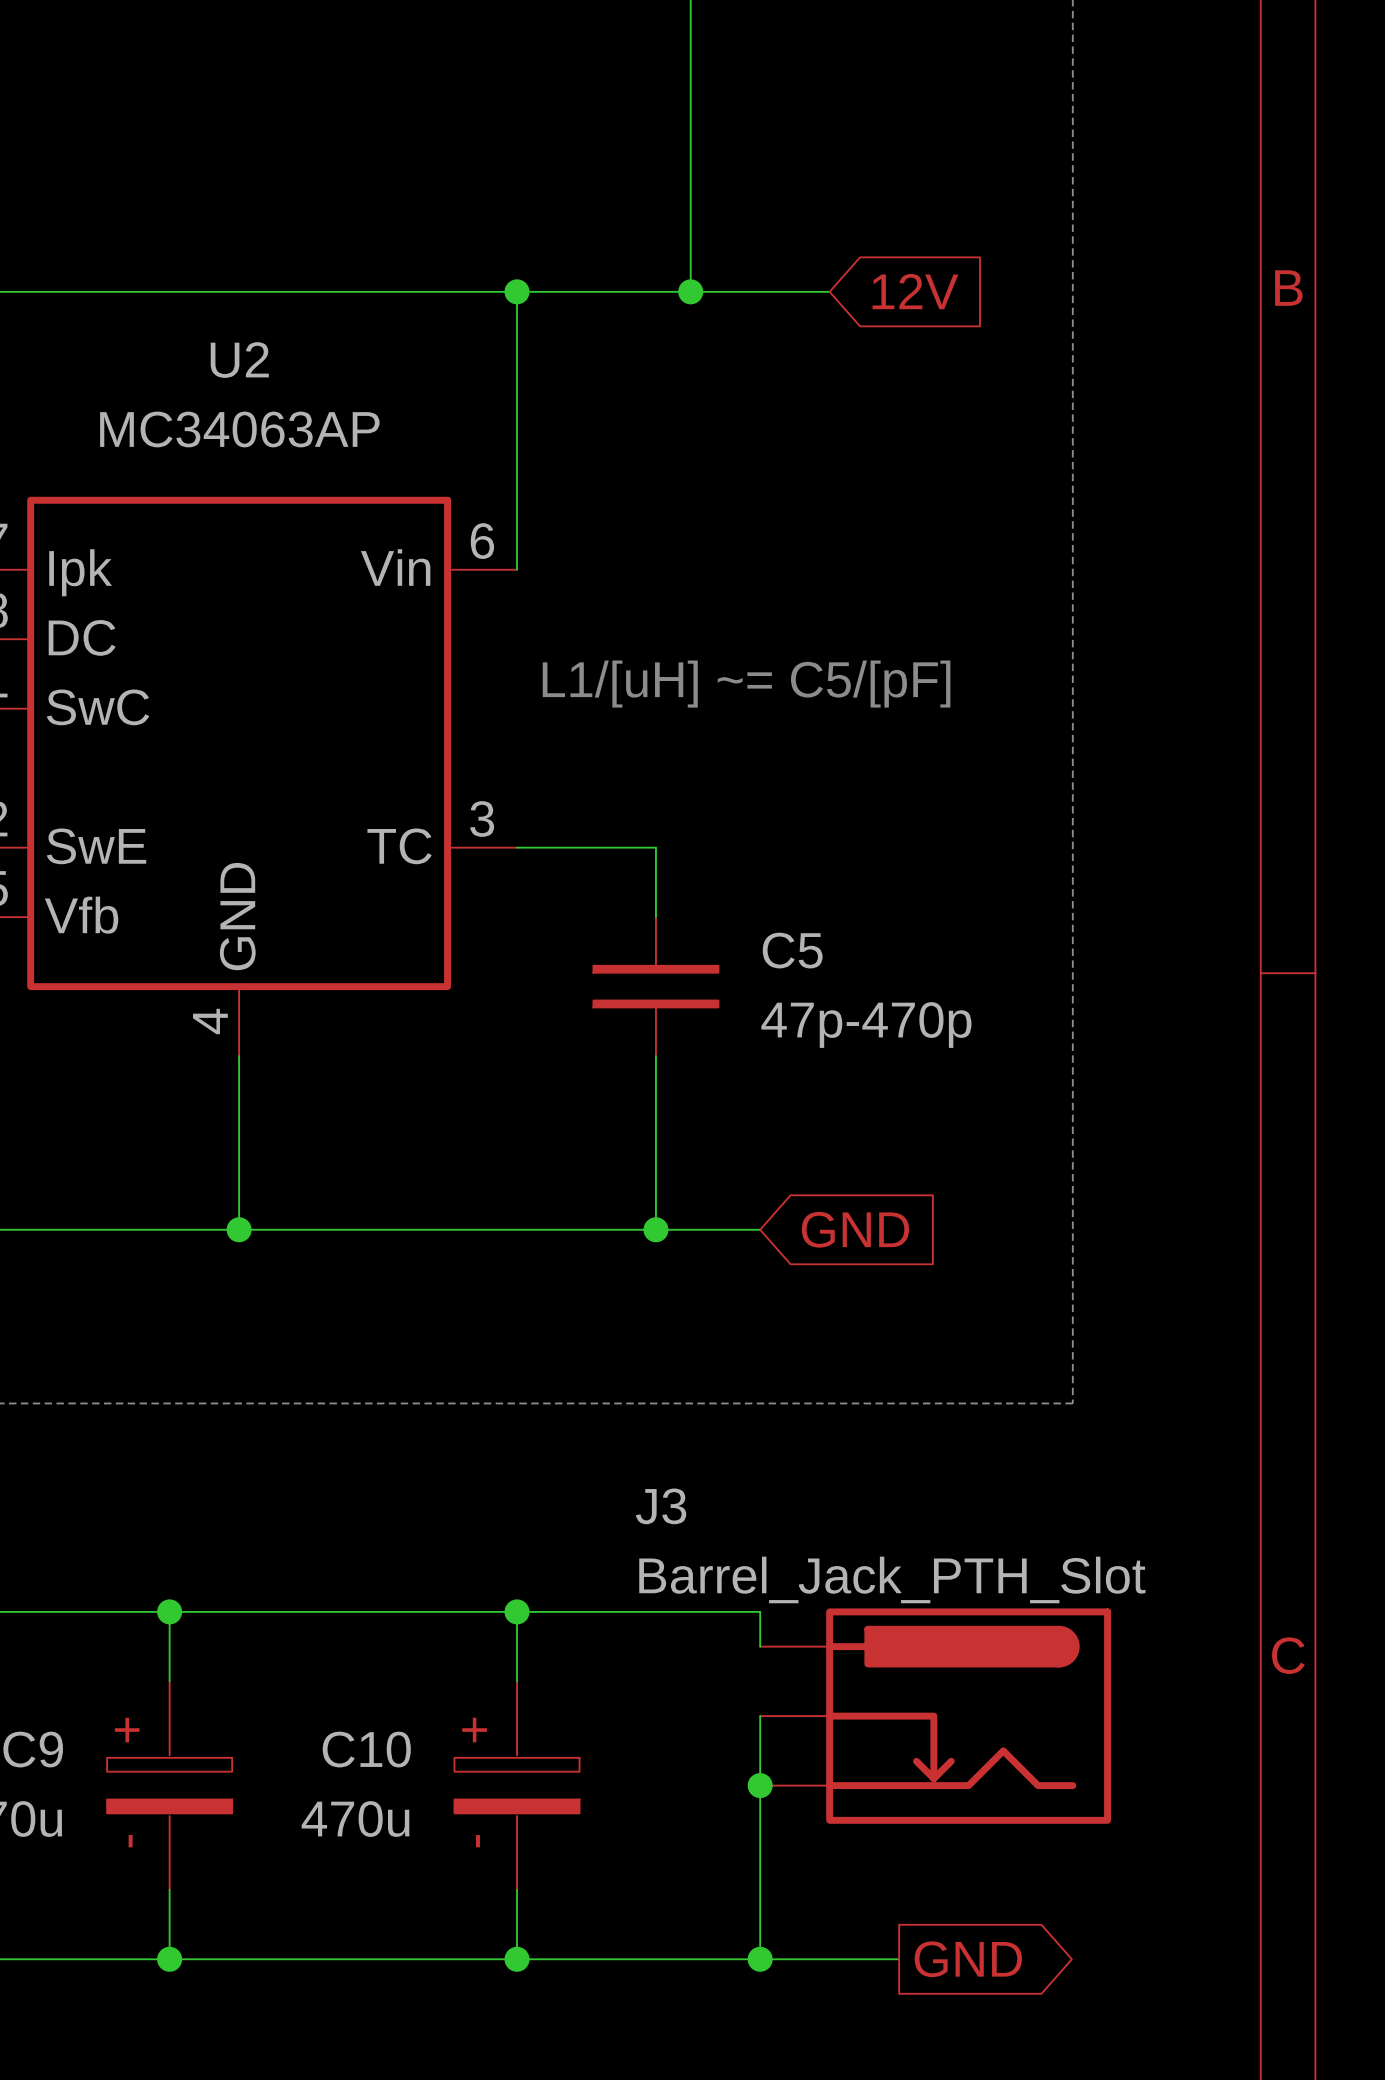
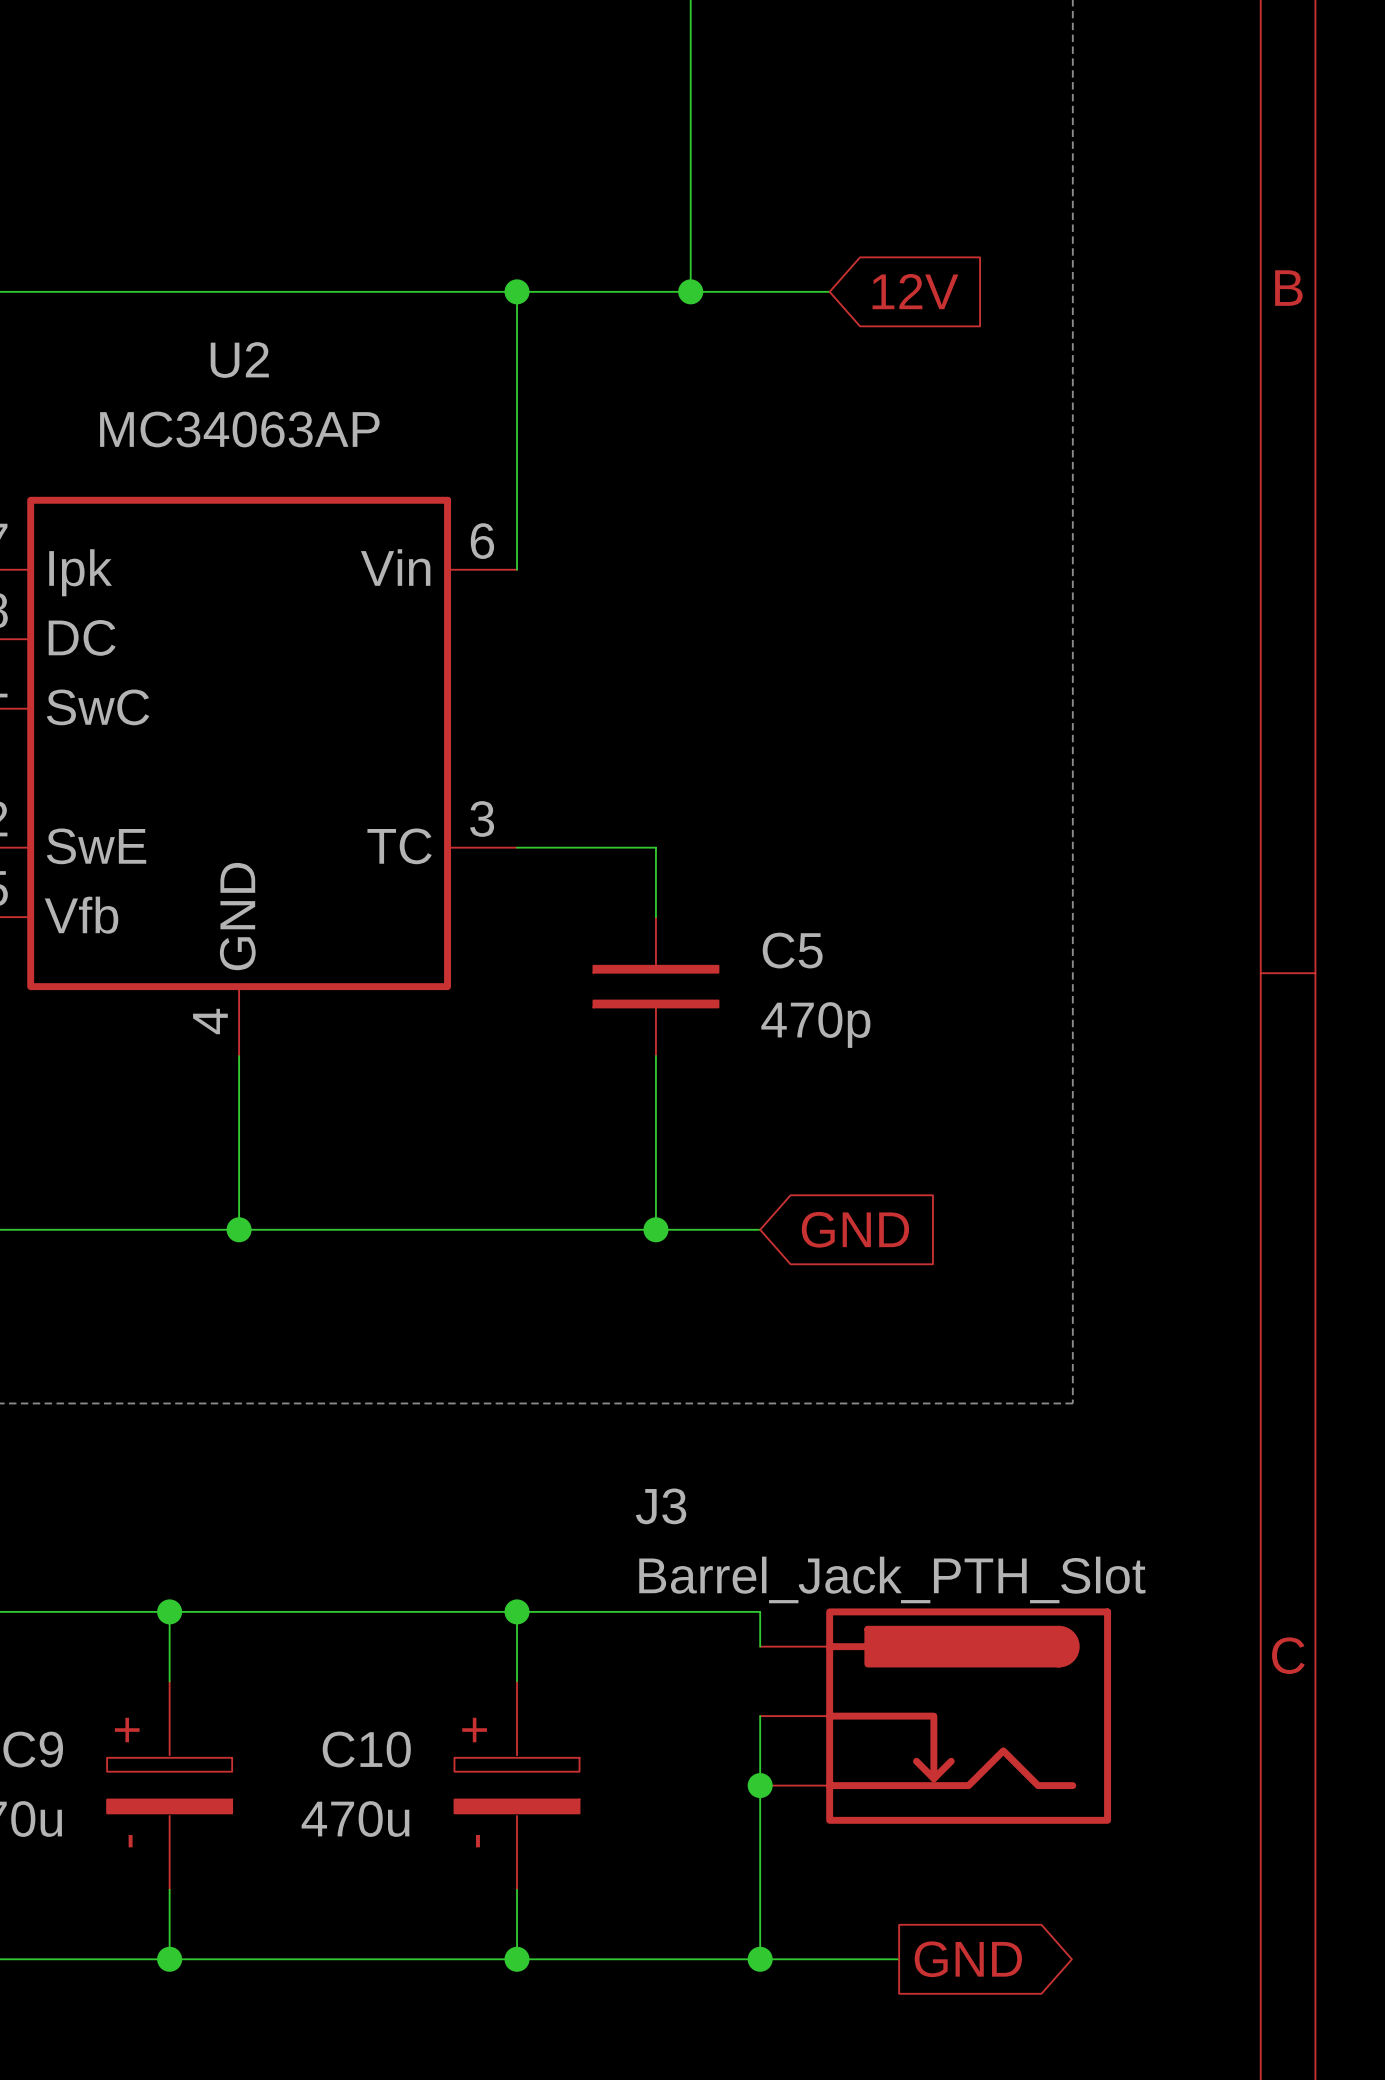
text: L1/[uH] ~= C5/[pF] (746, 684) -> none
C5 value: 47p-470p (866, 1025) -> 470p (815, 1025)

